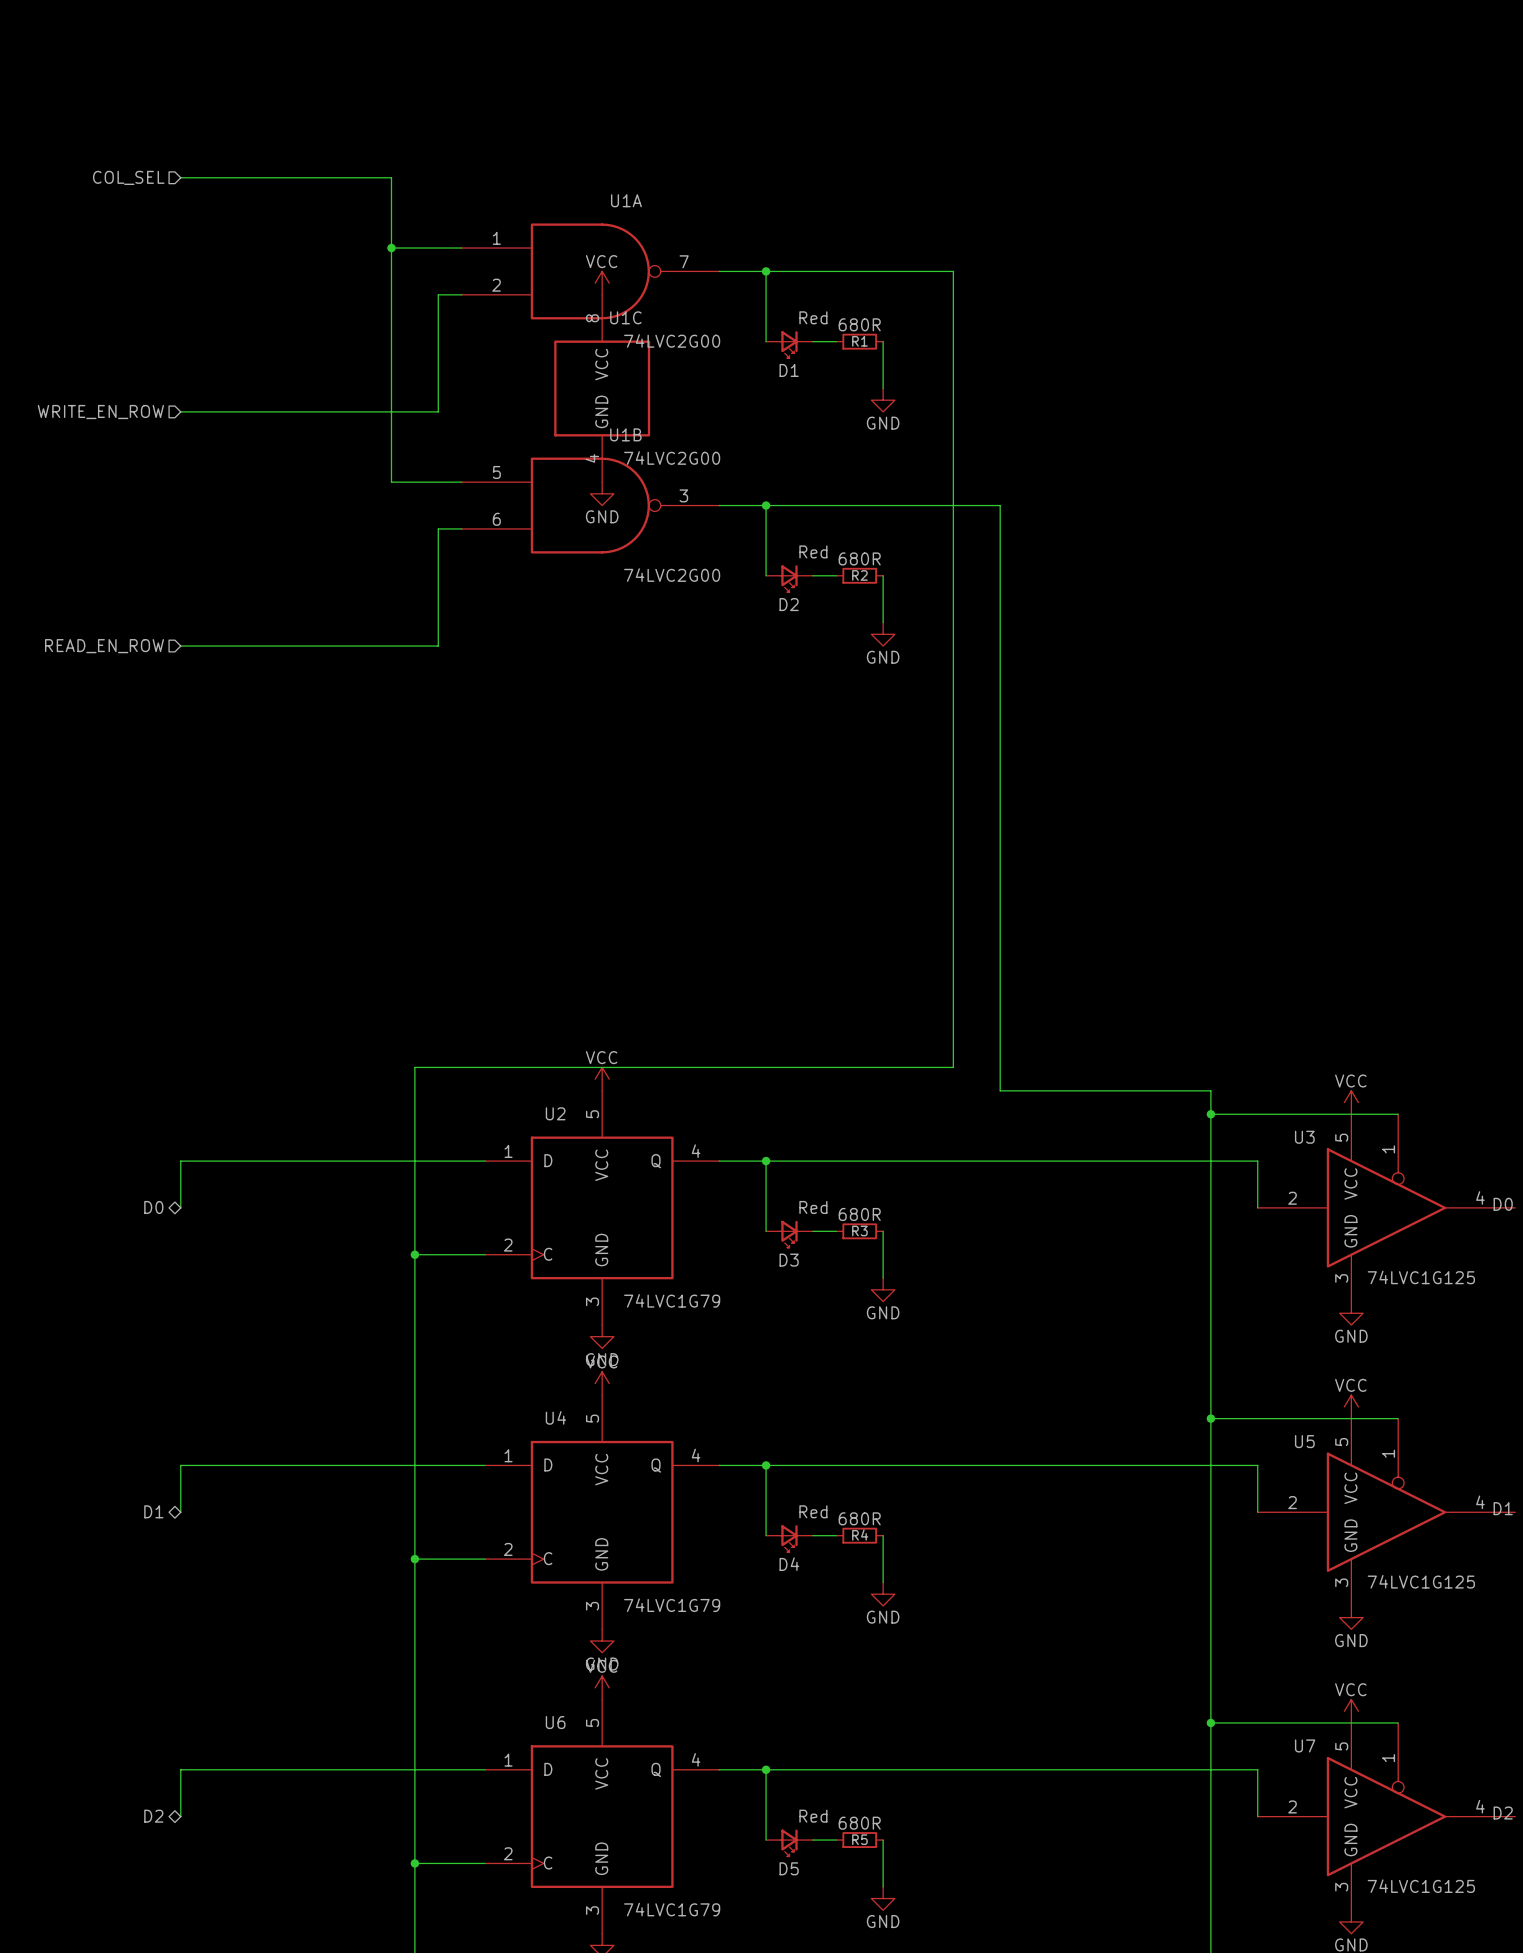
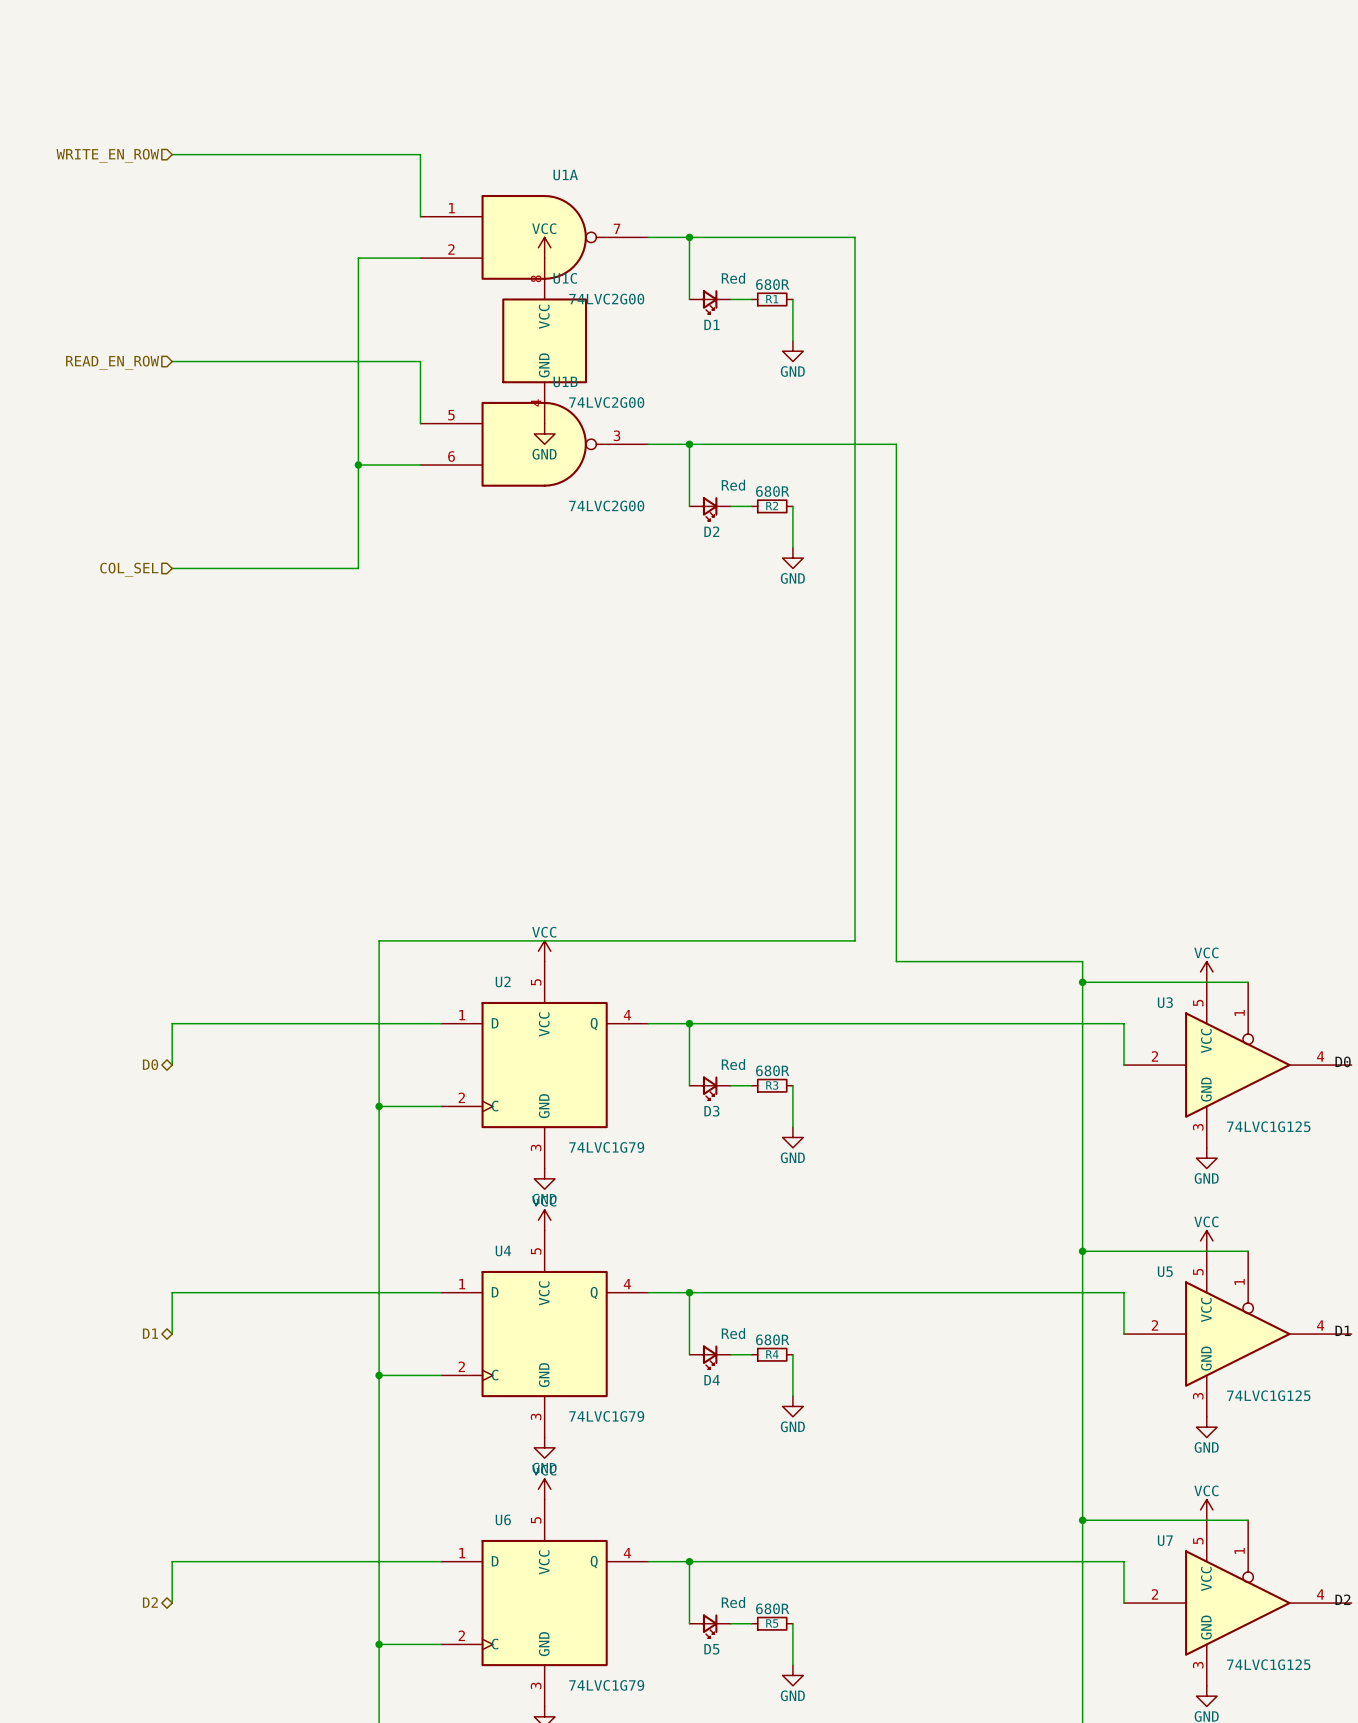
hierarchical label: COL_SEL (128, 177) -> WRITE_EN_ROW (107, 155)
wire: (391, 177) (391, 294) -> (399, 258) (358, 258)
wire: (391, 248) (461, 248) -> (358, 154) (420, 154) (420, 216)
junction: (391, 248) -> none
wire: (438, 294) (438, 411) -> none
hierarchical label: WRITE_EN_ROW (100, 412) -> READ_EN_ROW (112, 362)
wire: (391, 482) (461, 482) -> (399, 361) (420, 361) (420, 423)
wire: none -> (358, 465) (399, 465)
junction: none -> (358, 465)
wire: (438, 528) (438, 646) (391, 646) -> (358, 423) (358, 568)
hierarchical label: READ_EN_ROW (104, 646) -> COL_SEL (129, 569)

